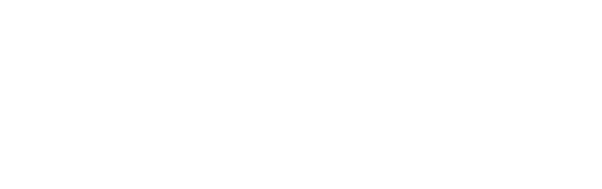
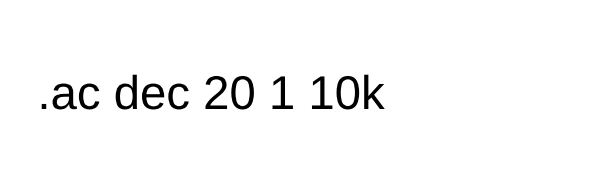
text: none -> .ac dec 20 1 10k (213, 92)

